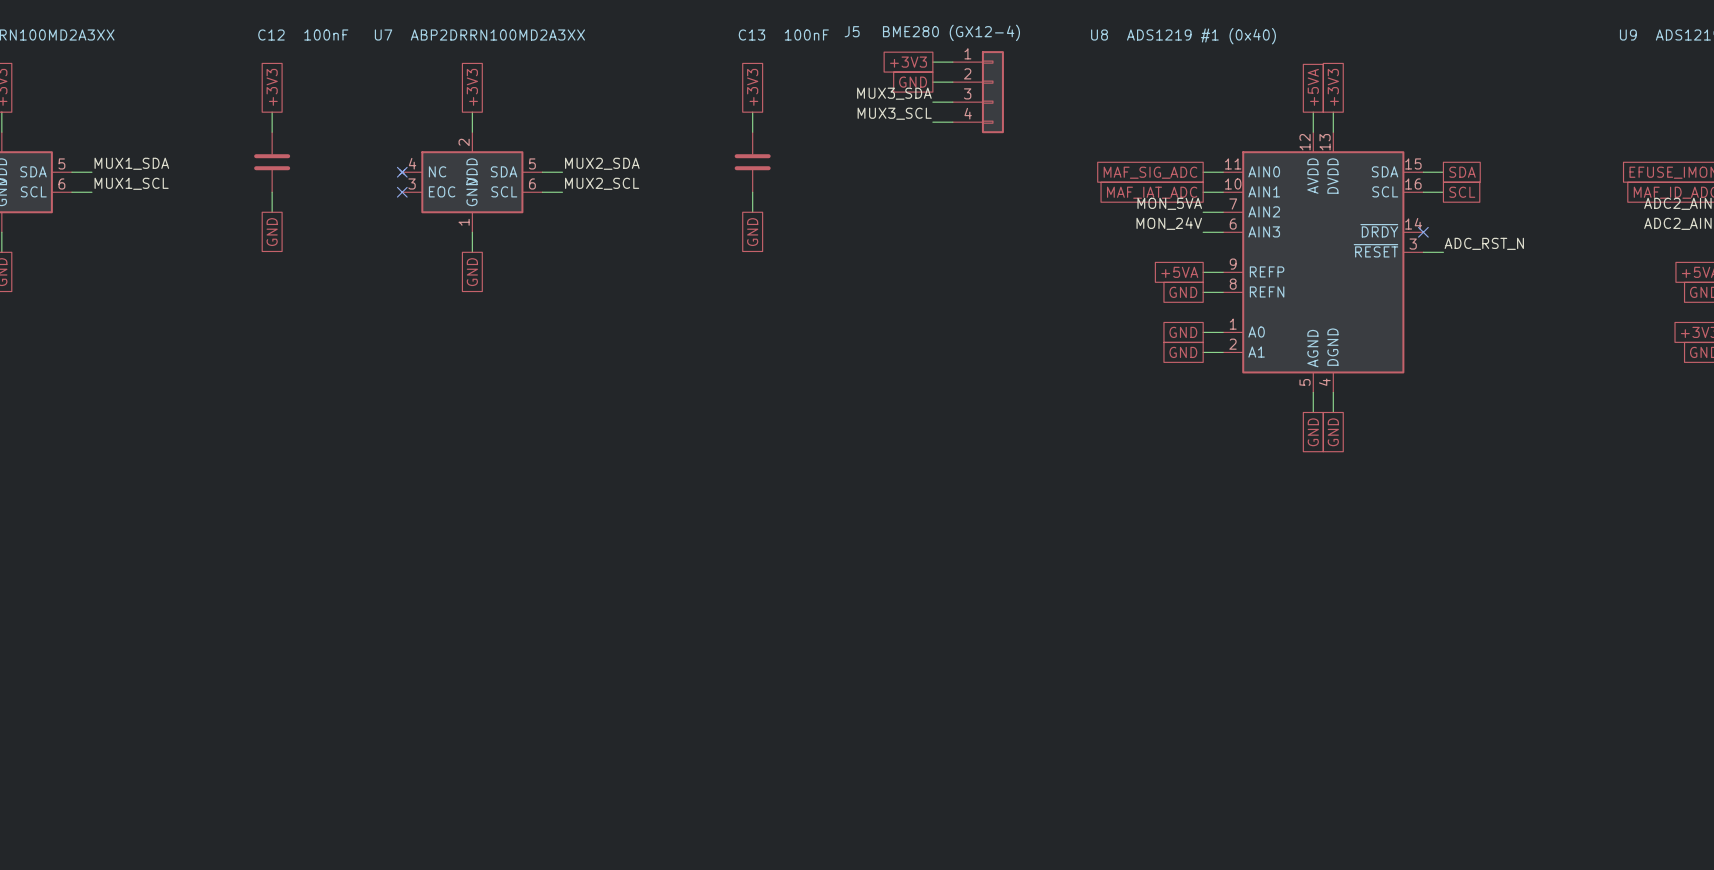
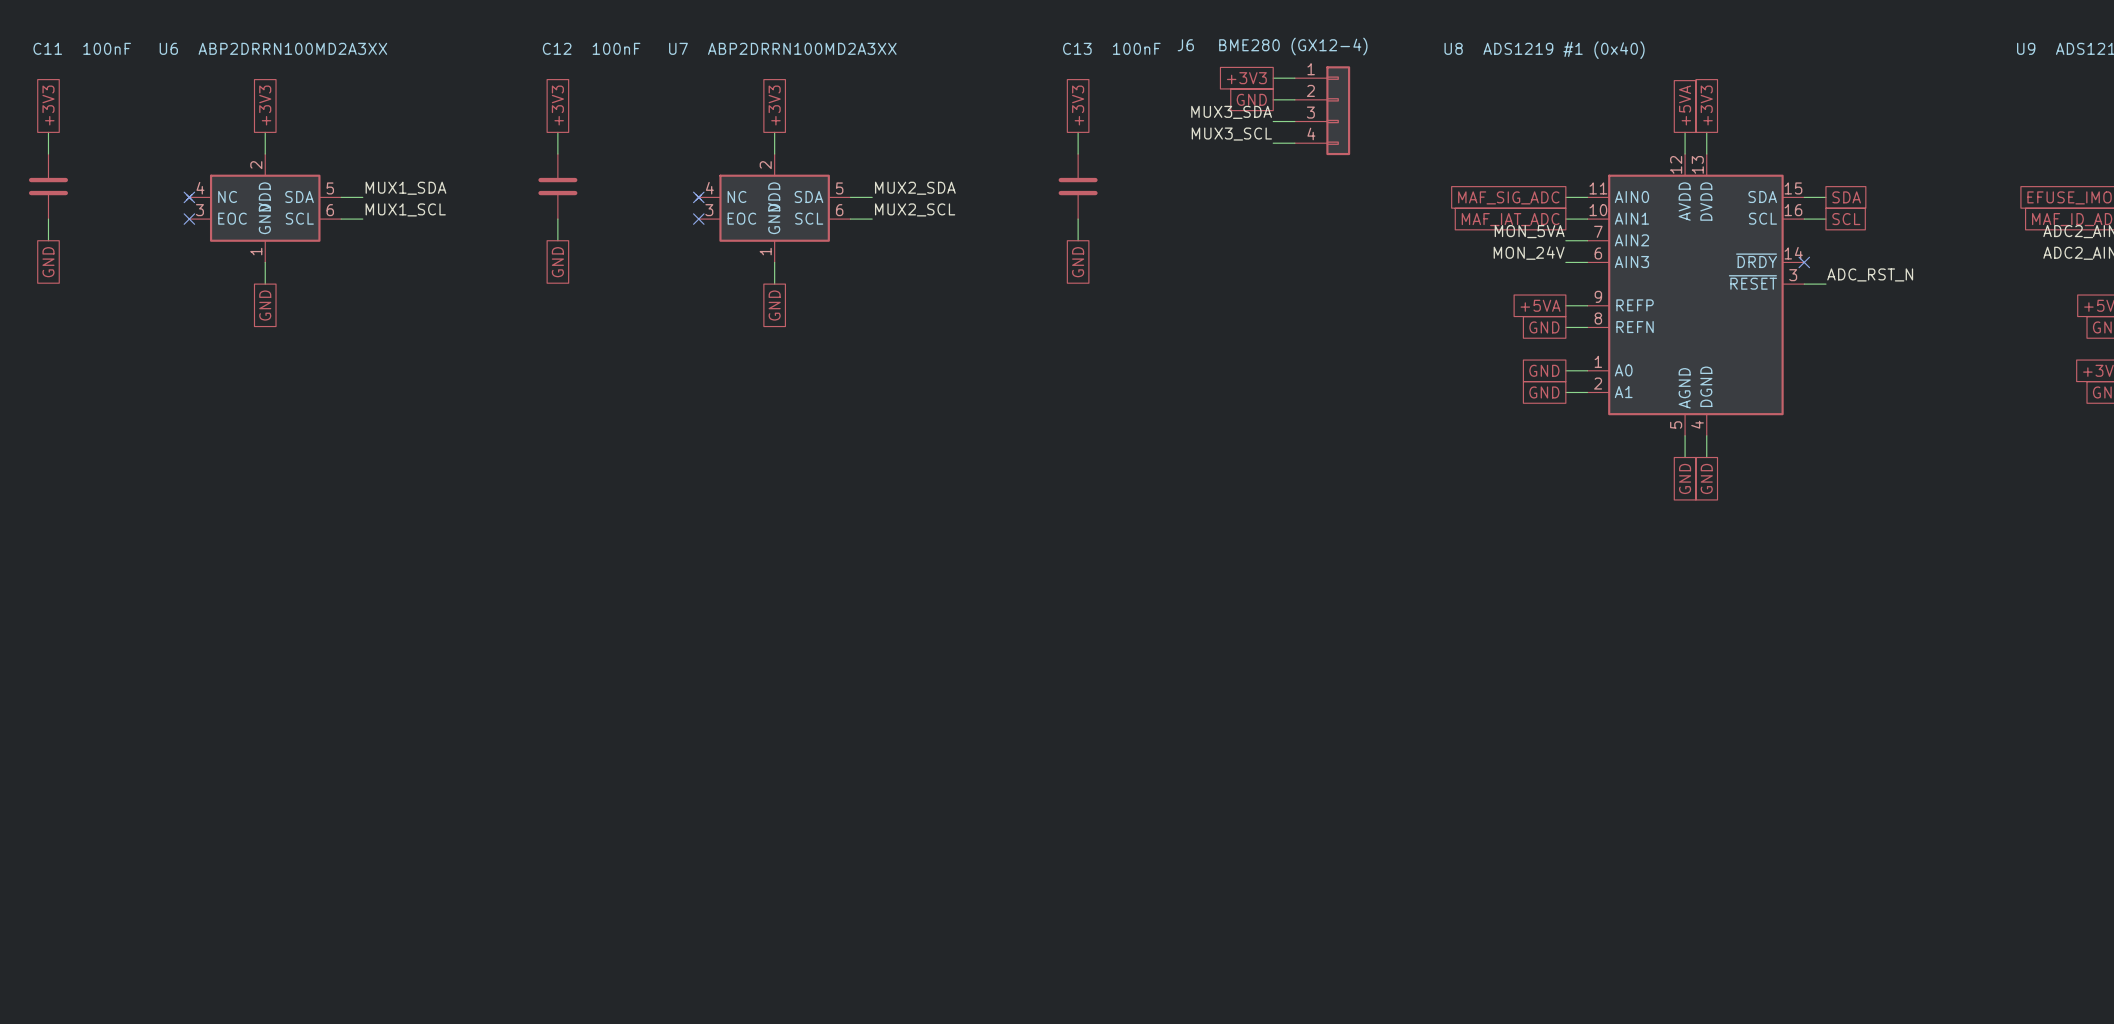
J5 name: J5 (852, 31) -> J6 (1185, 45)

